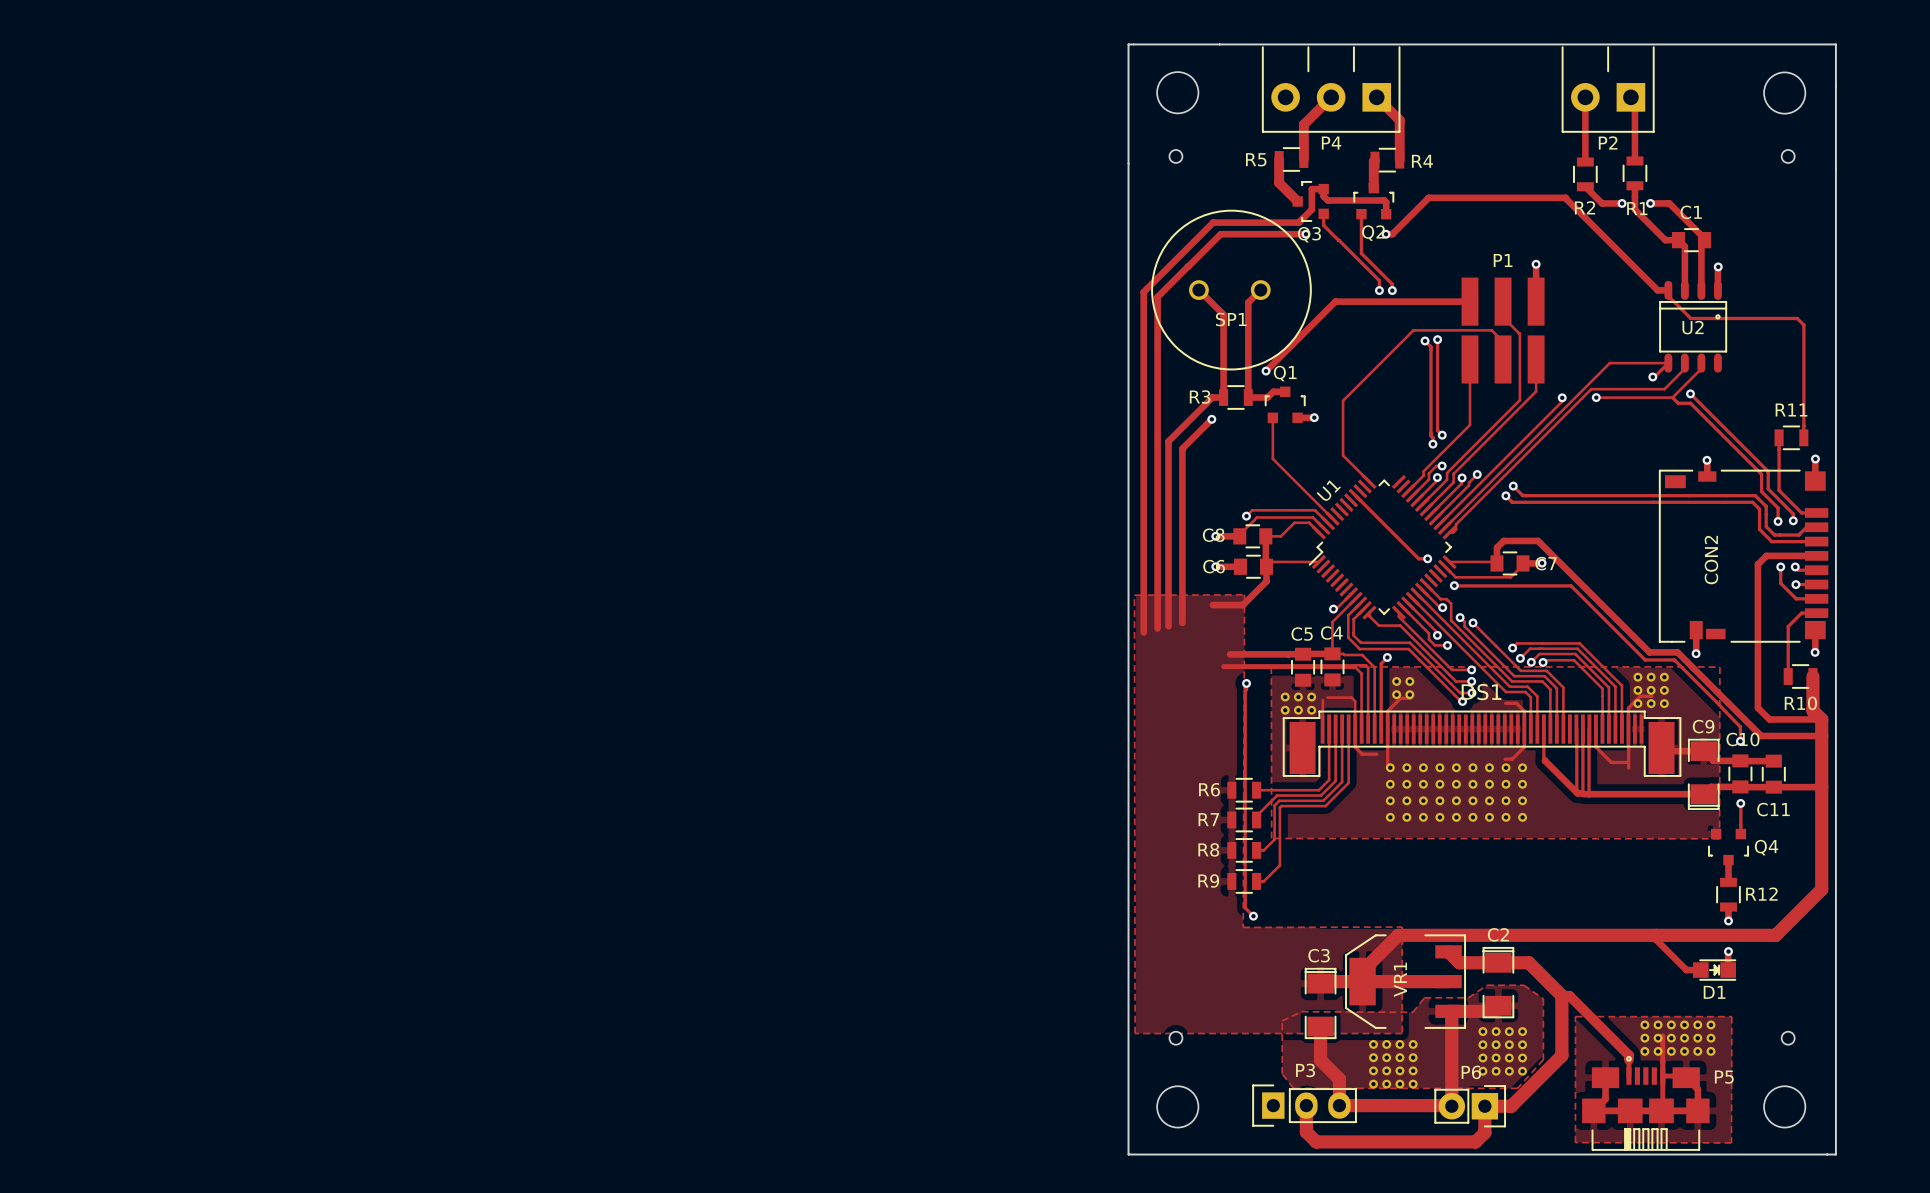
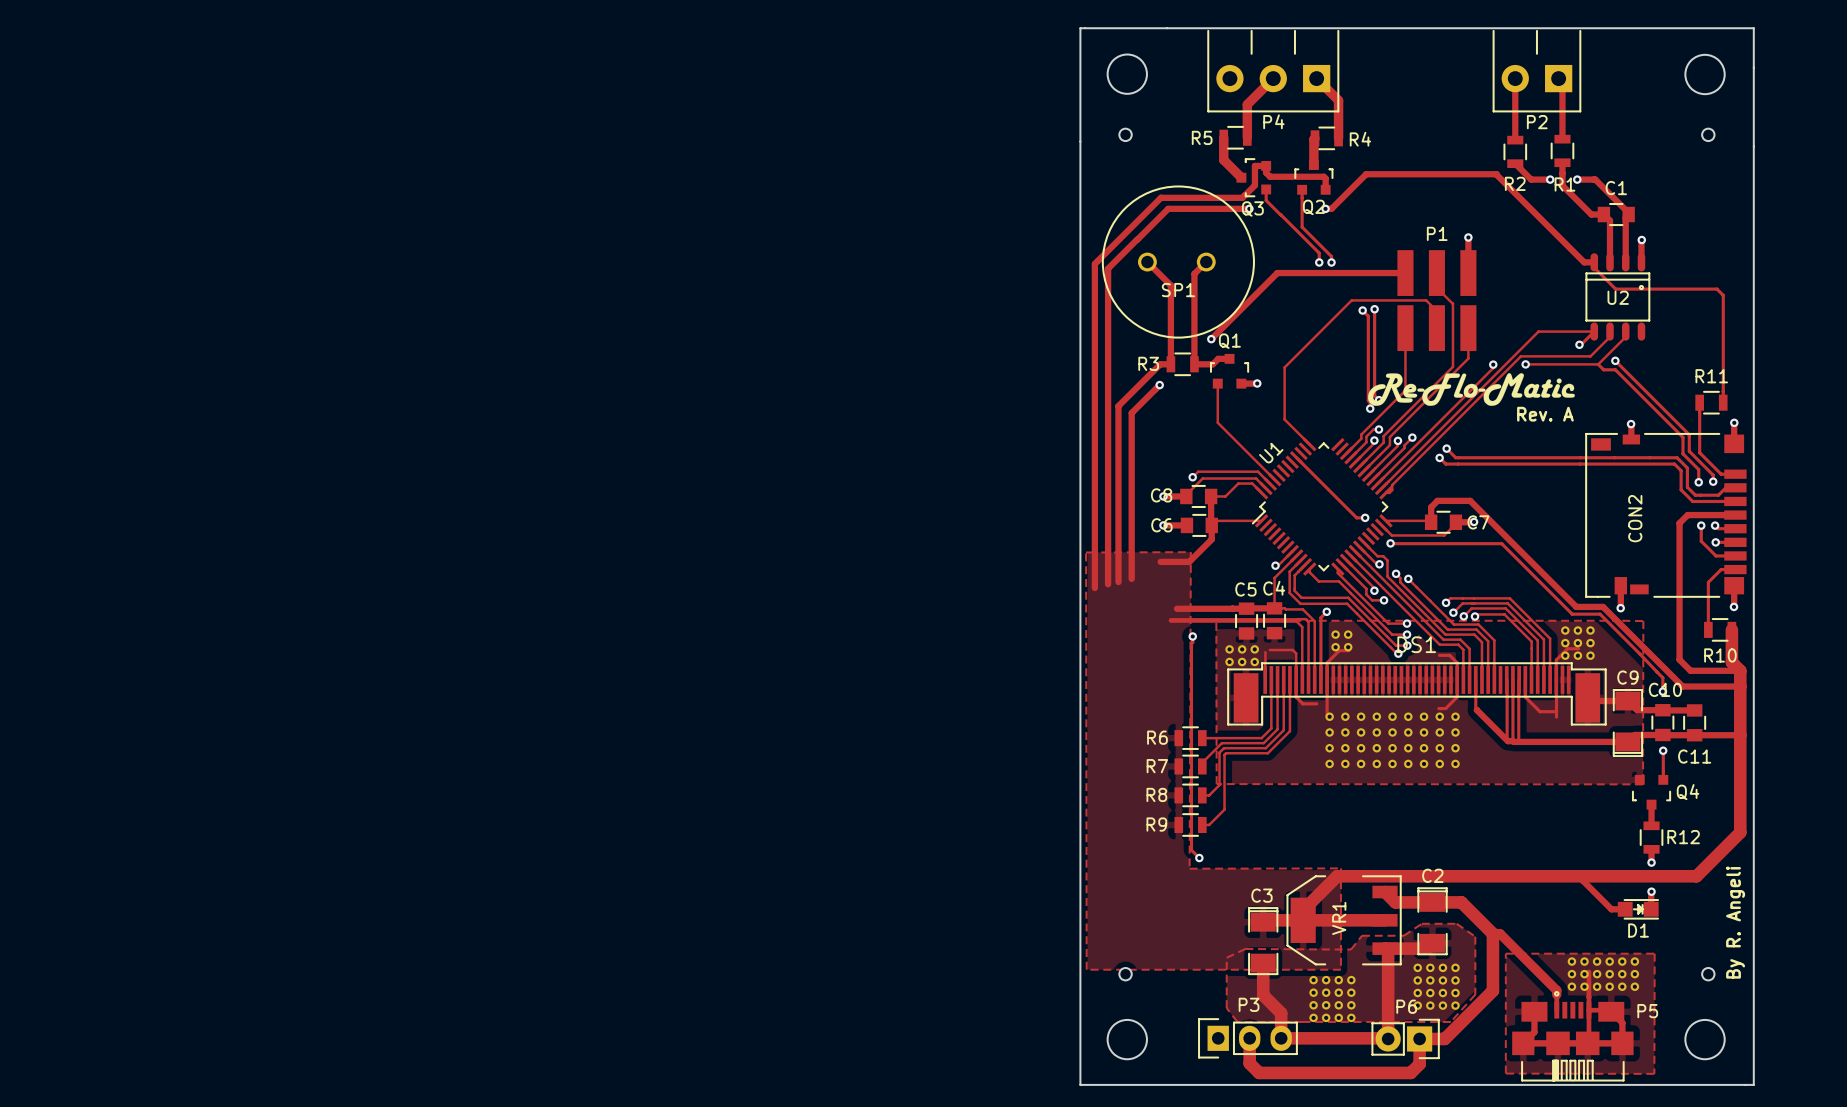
drawing: none -> [1368, 373, 1575, 406]
text: none -> Rev. A (1545, 414)
text: none -> By R. Angeli (1735, 922)

